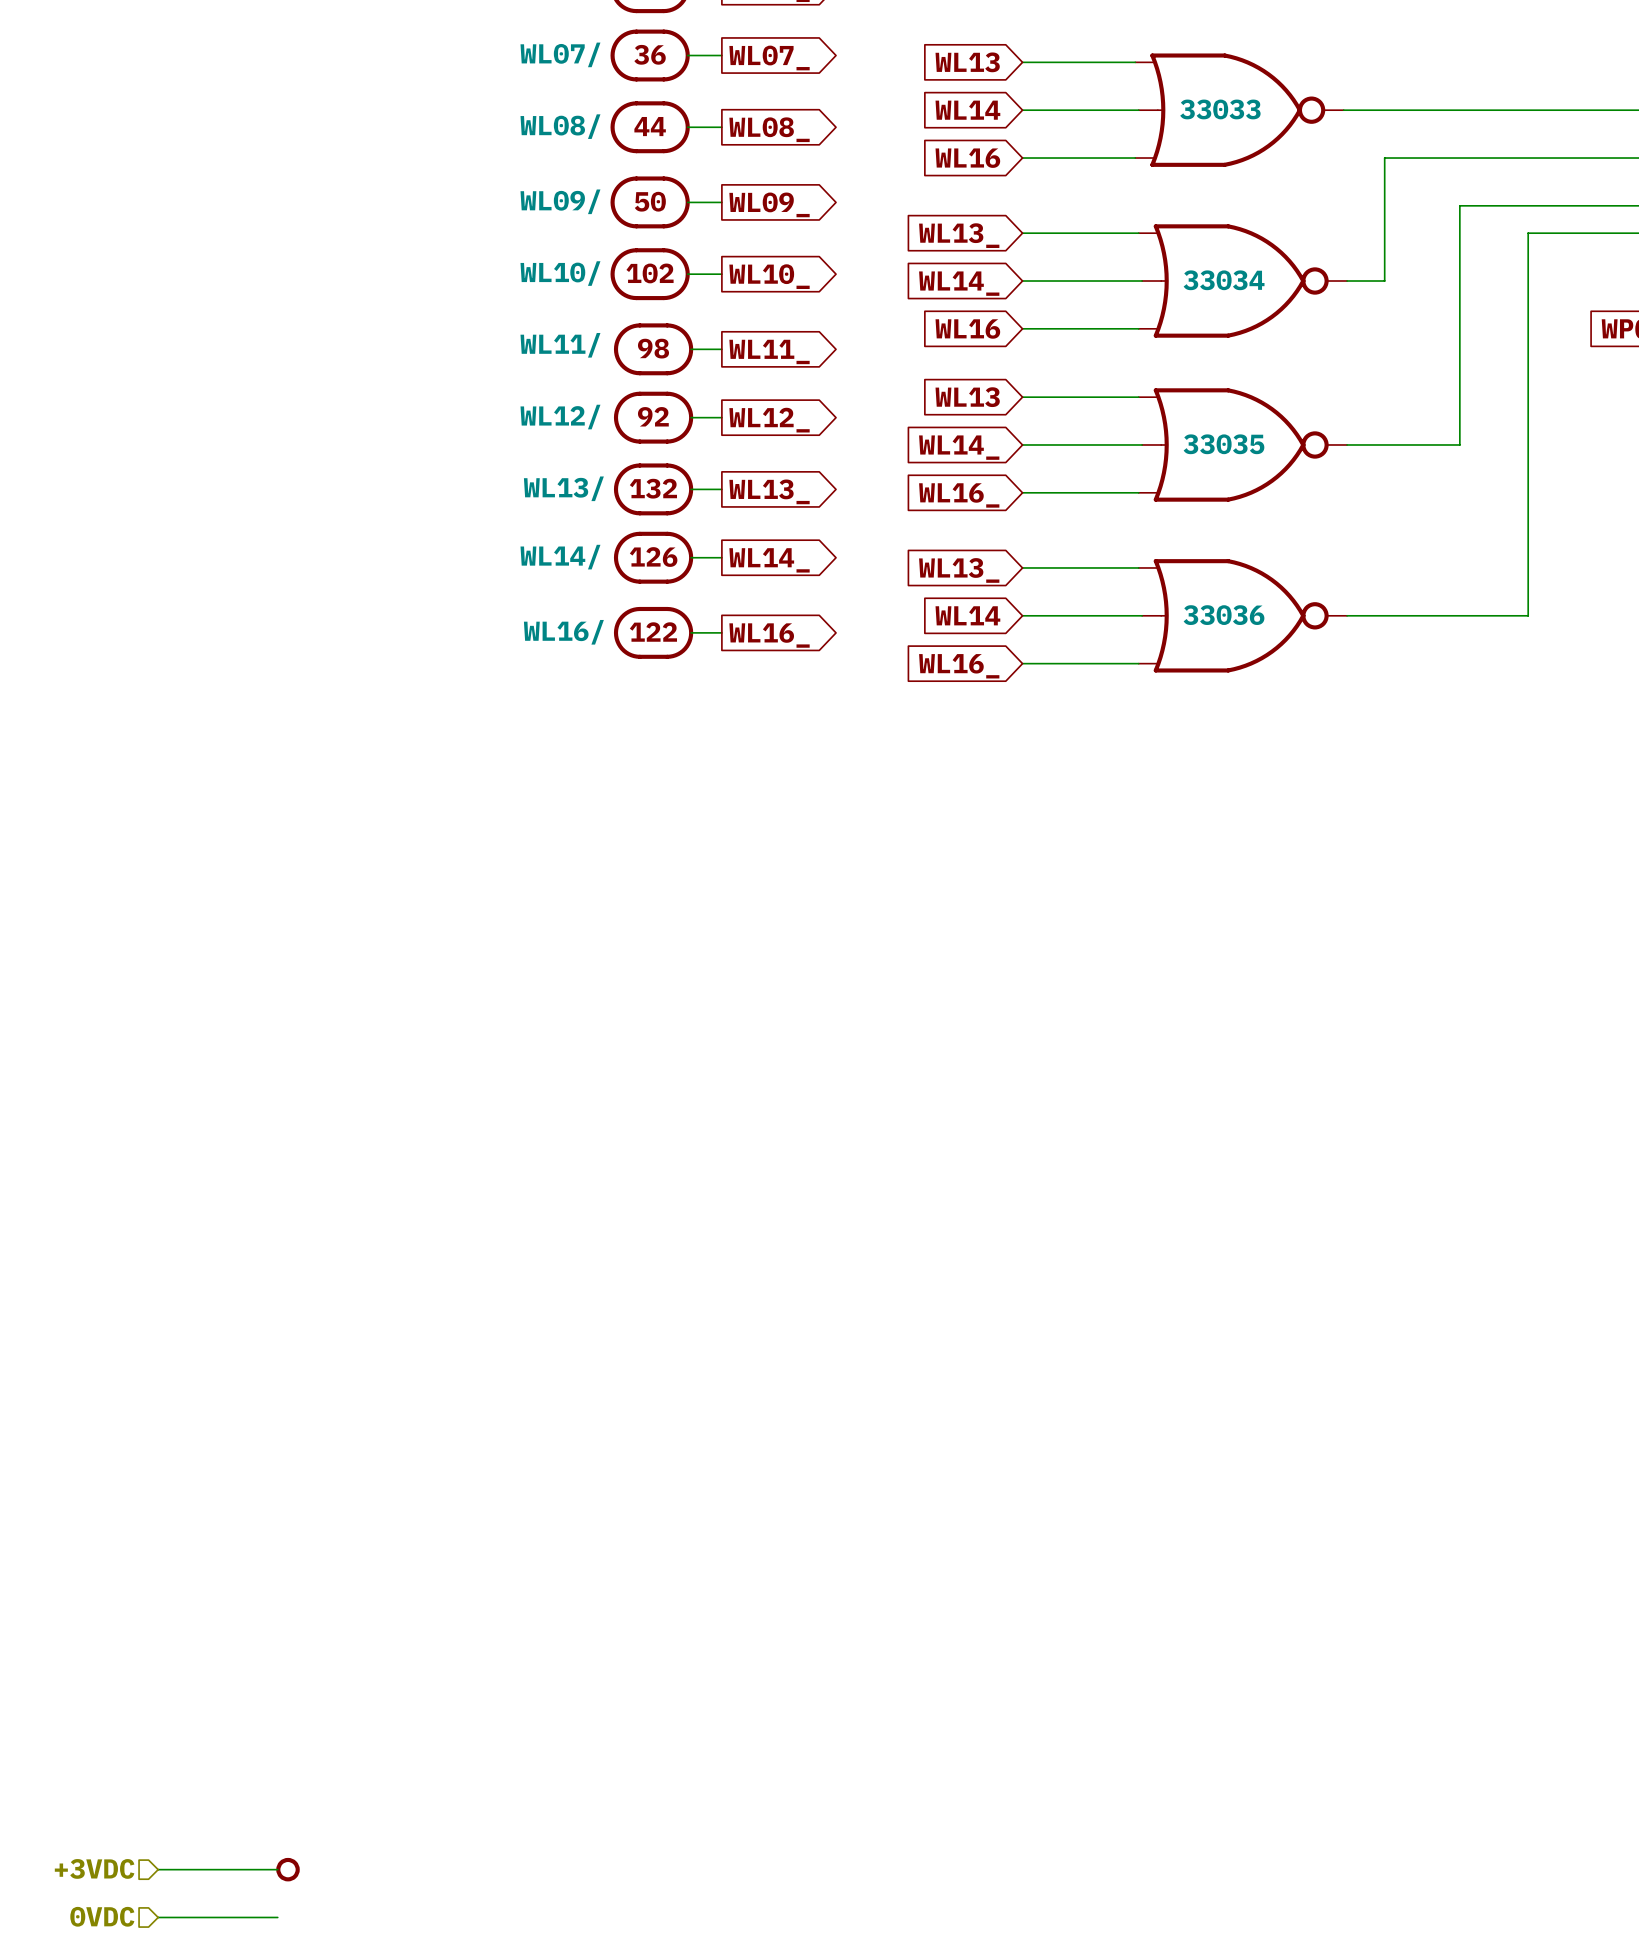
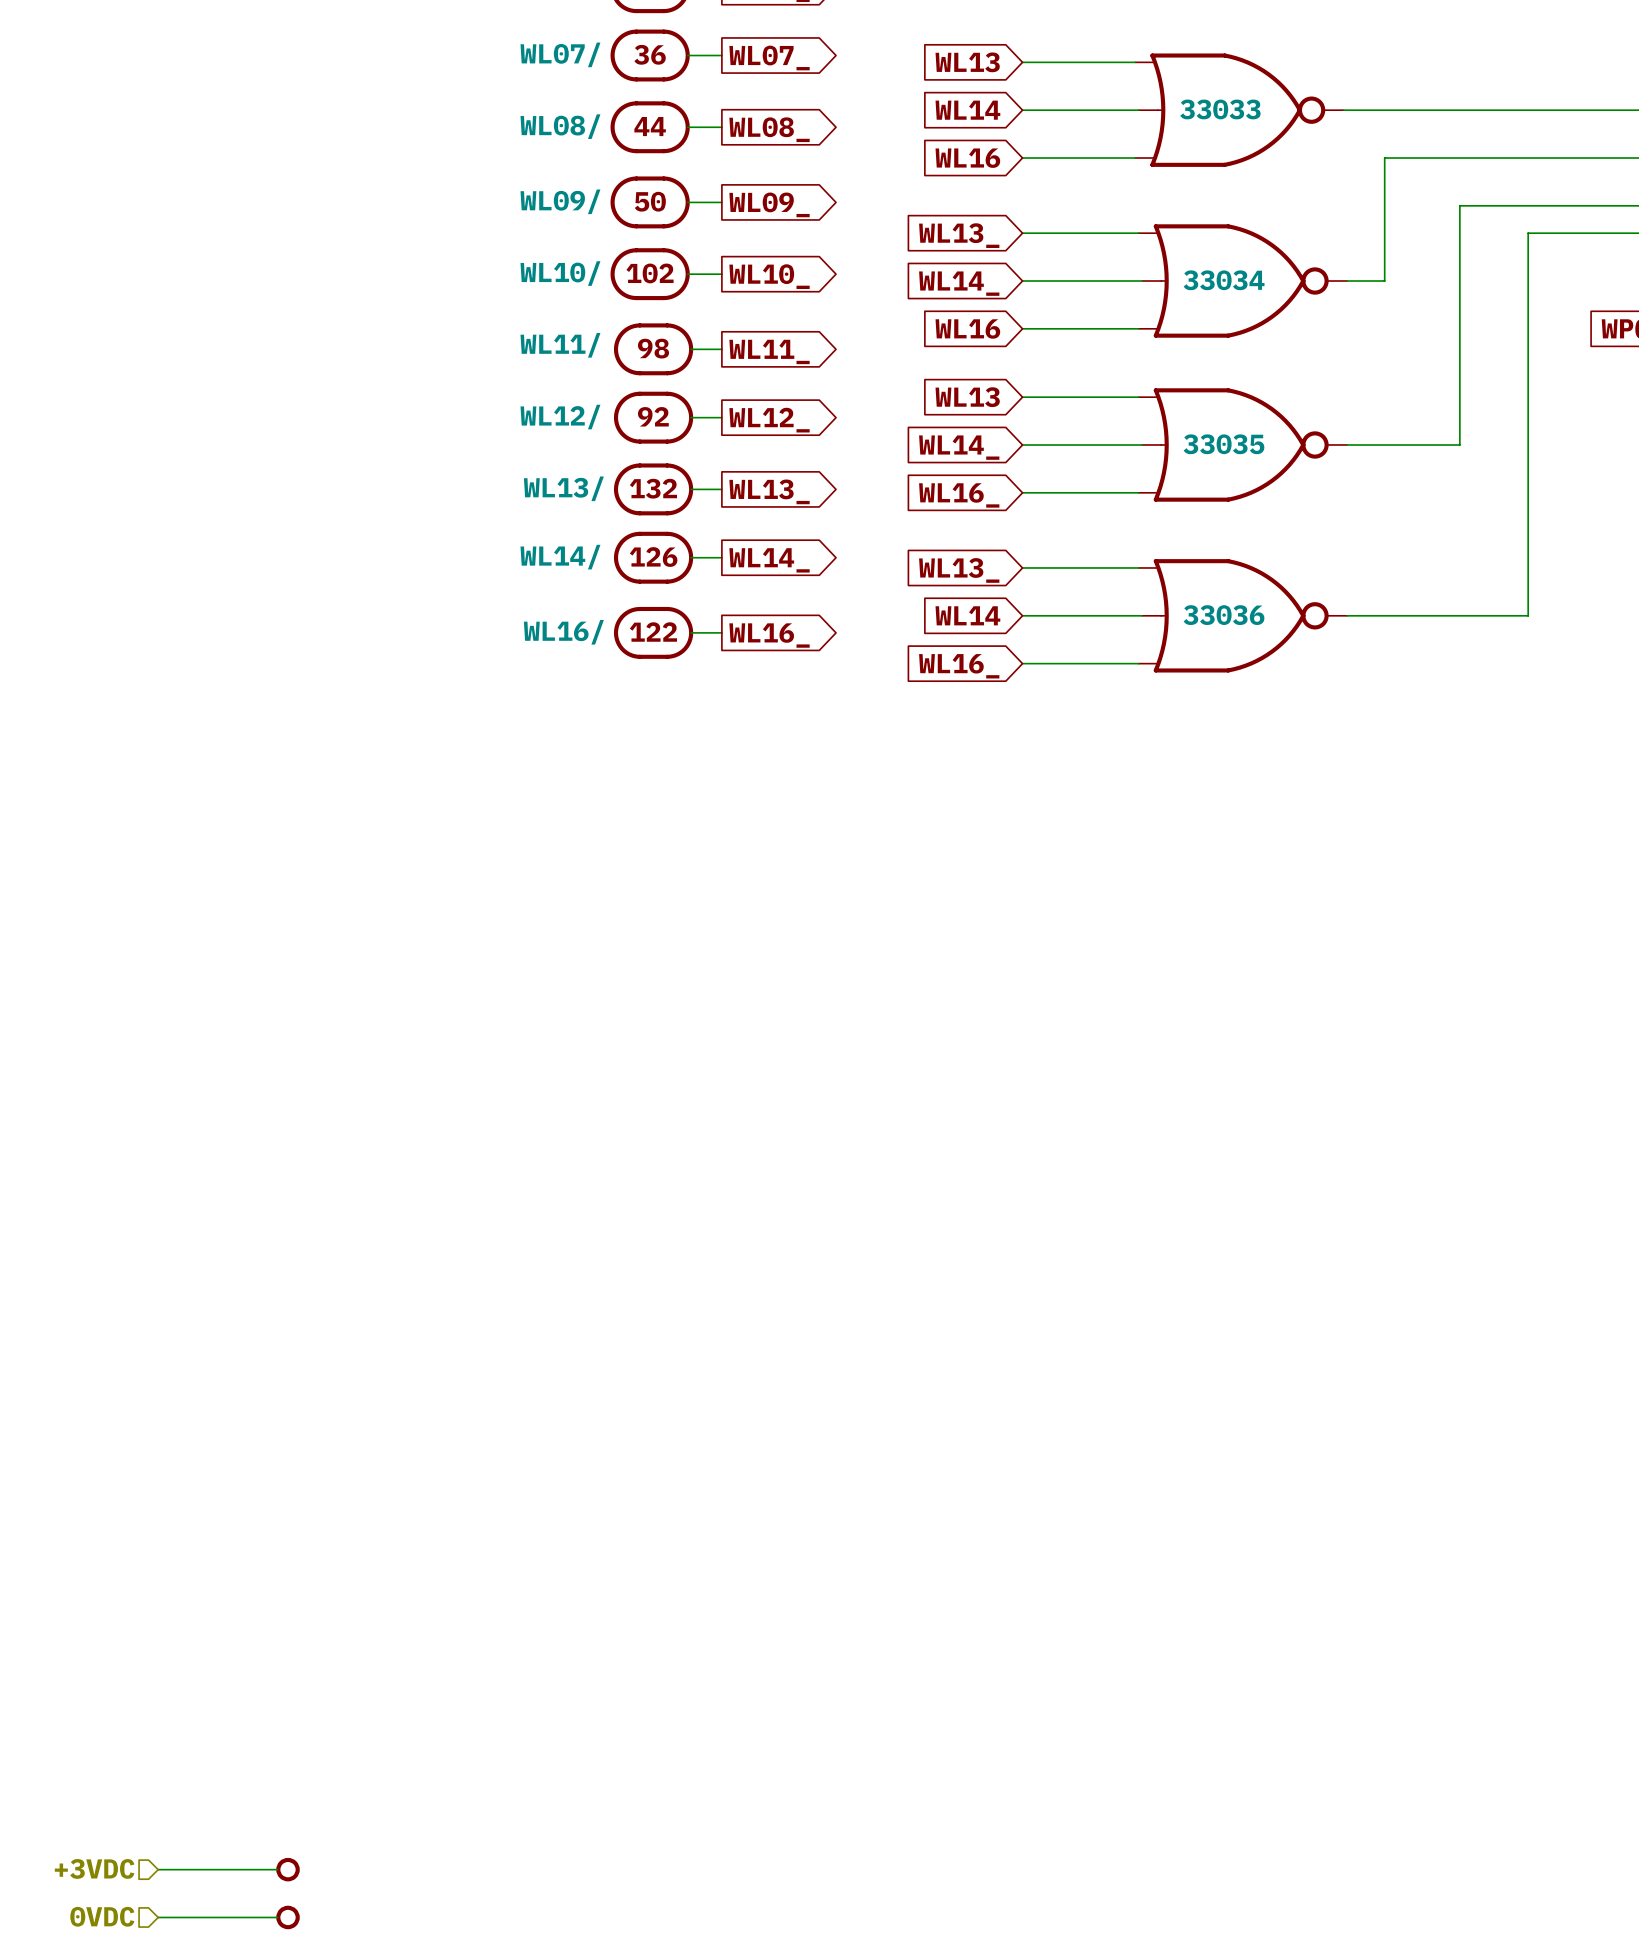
part: none -> (288, 1917)

